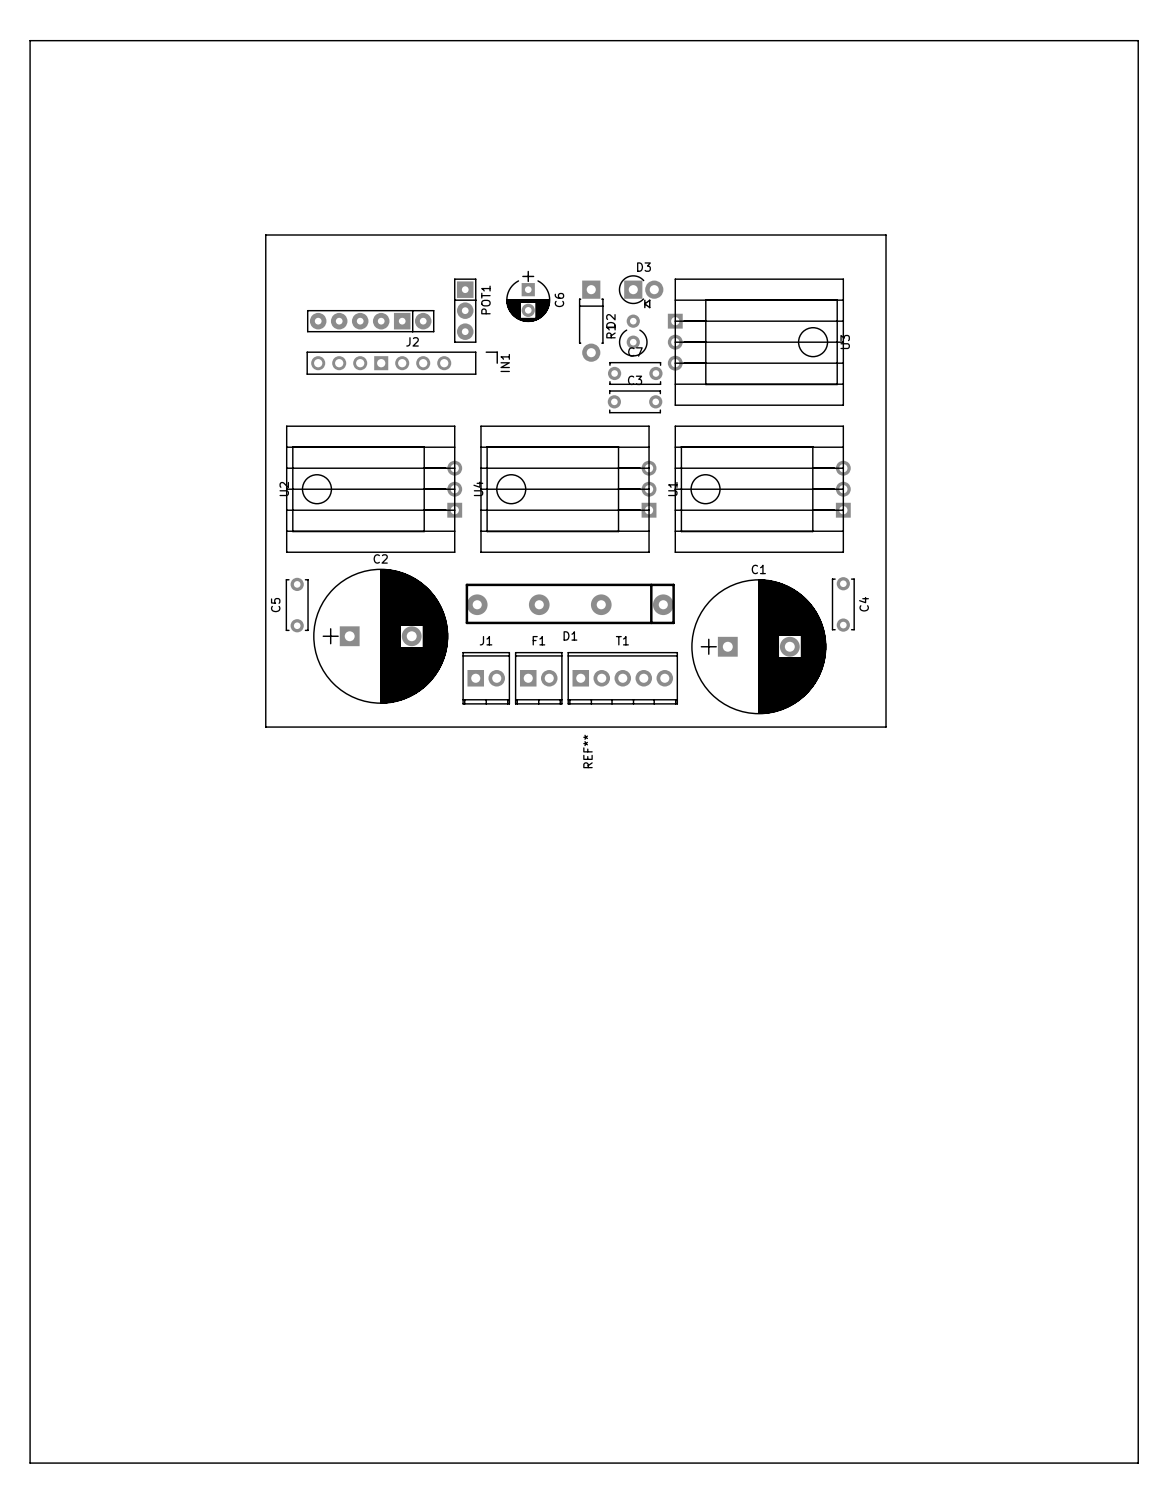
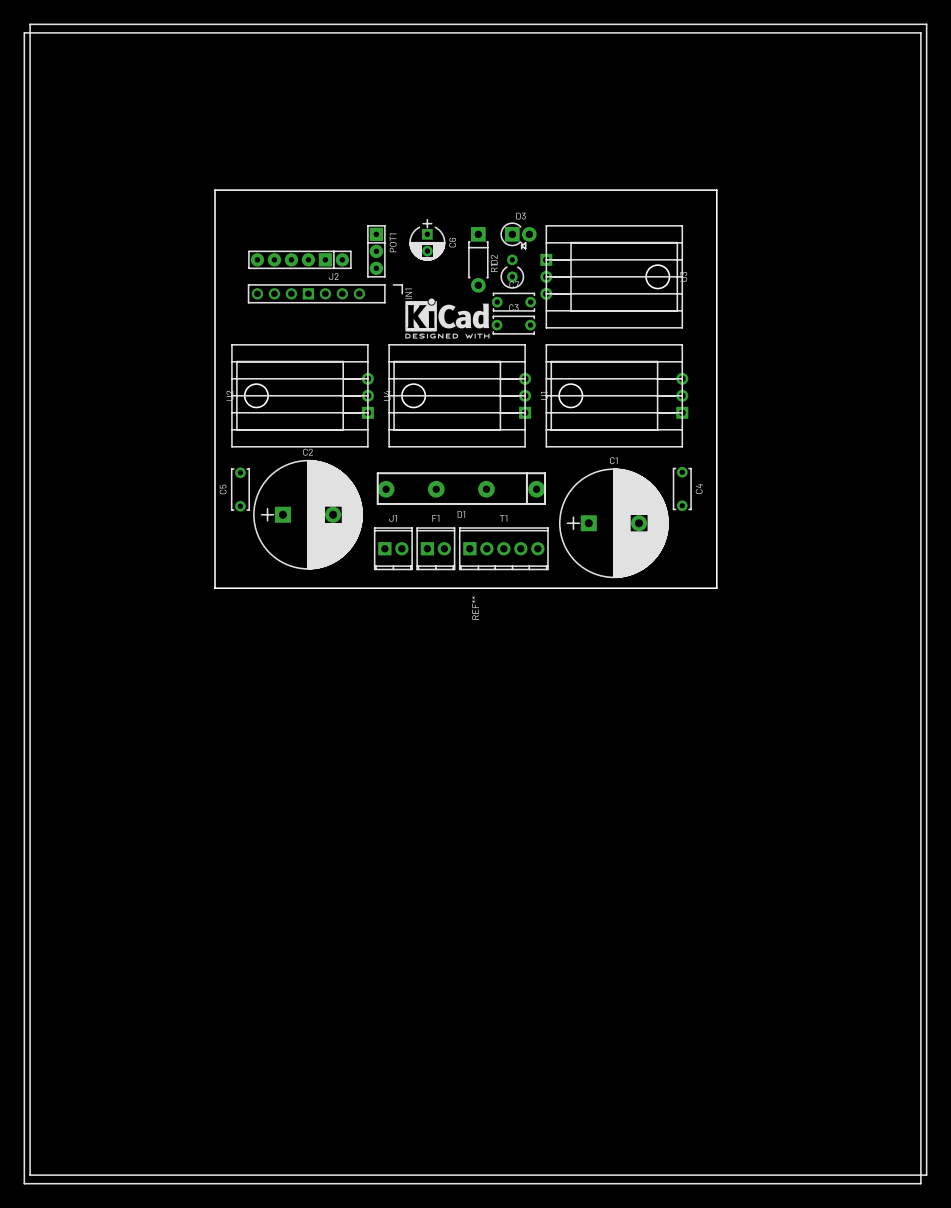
drawing: none -> [29, 23, 928, 1176]

